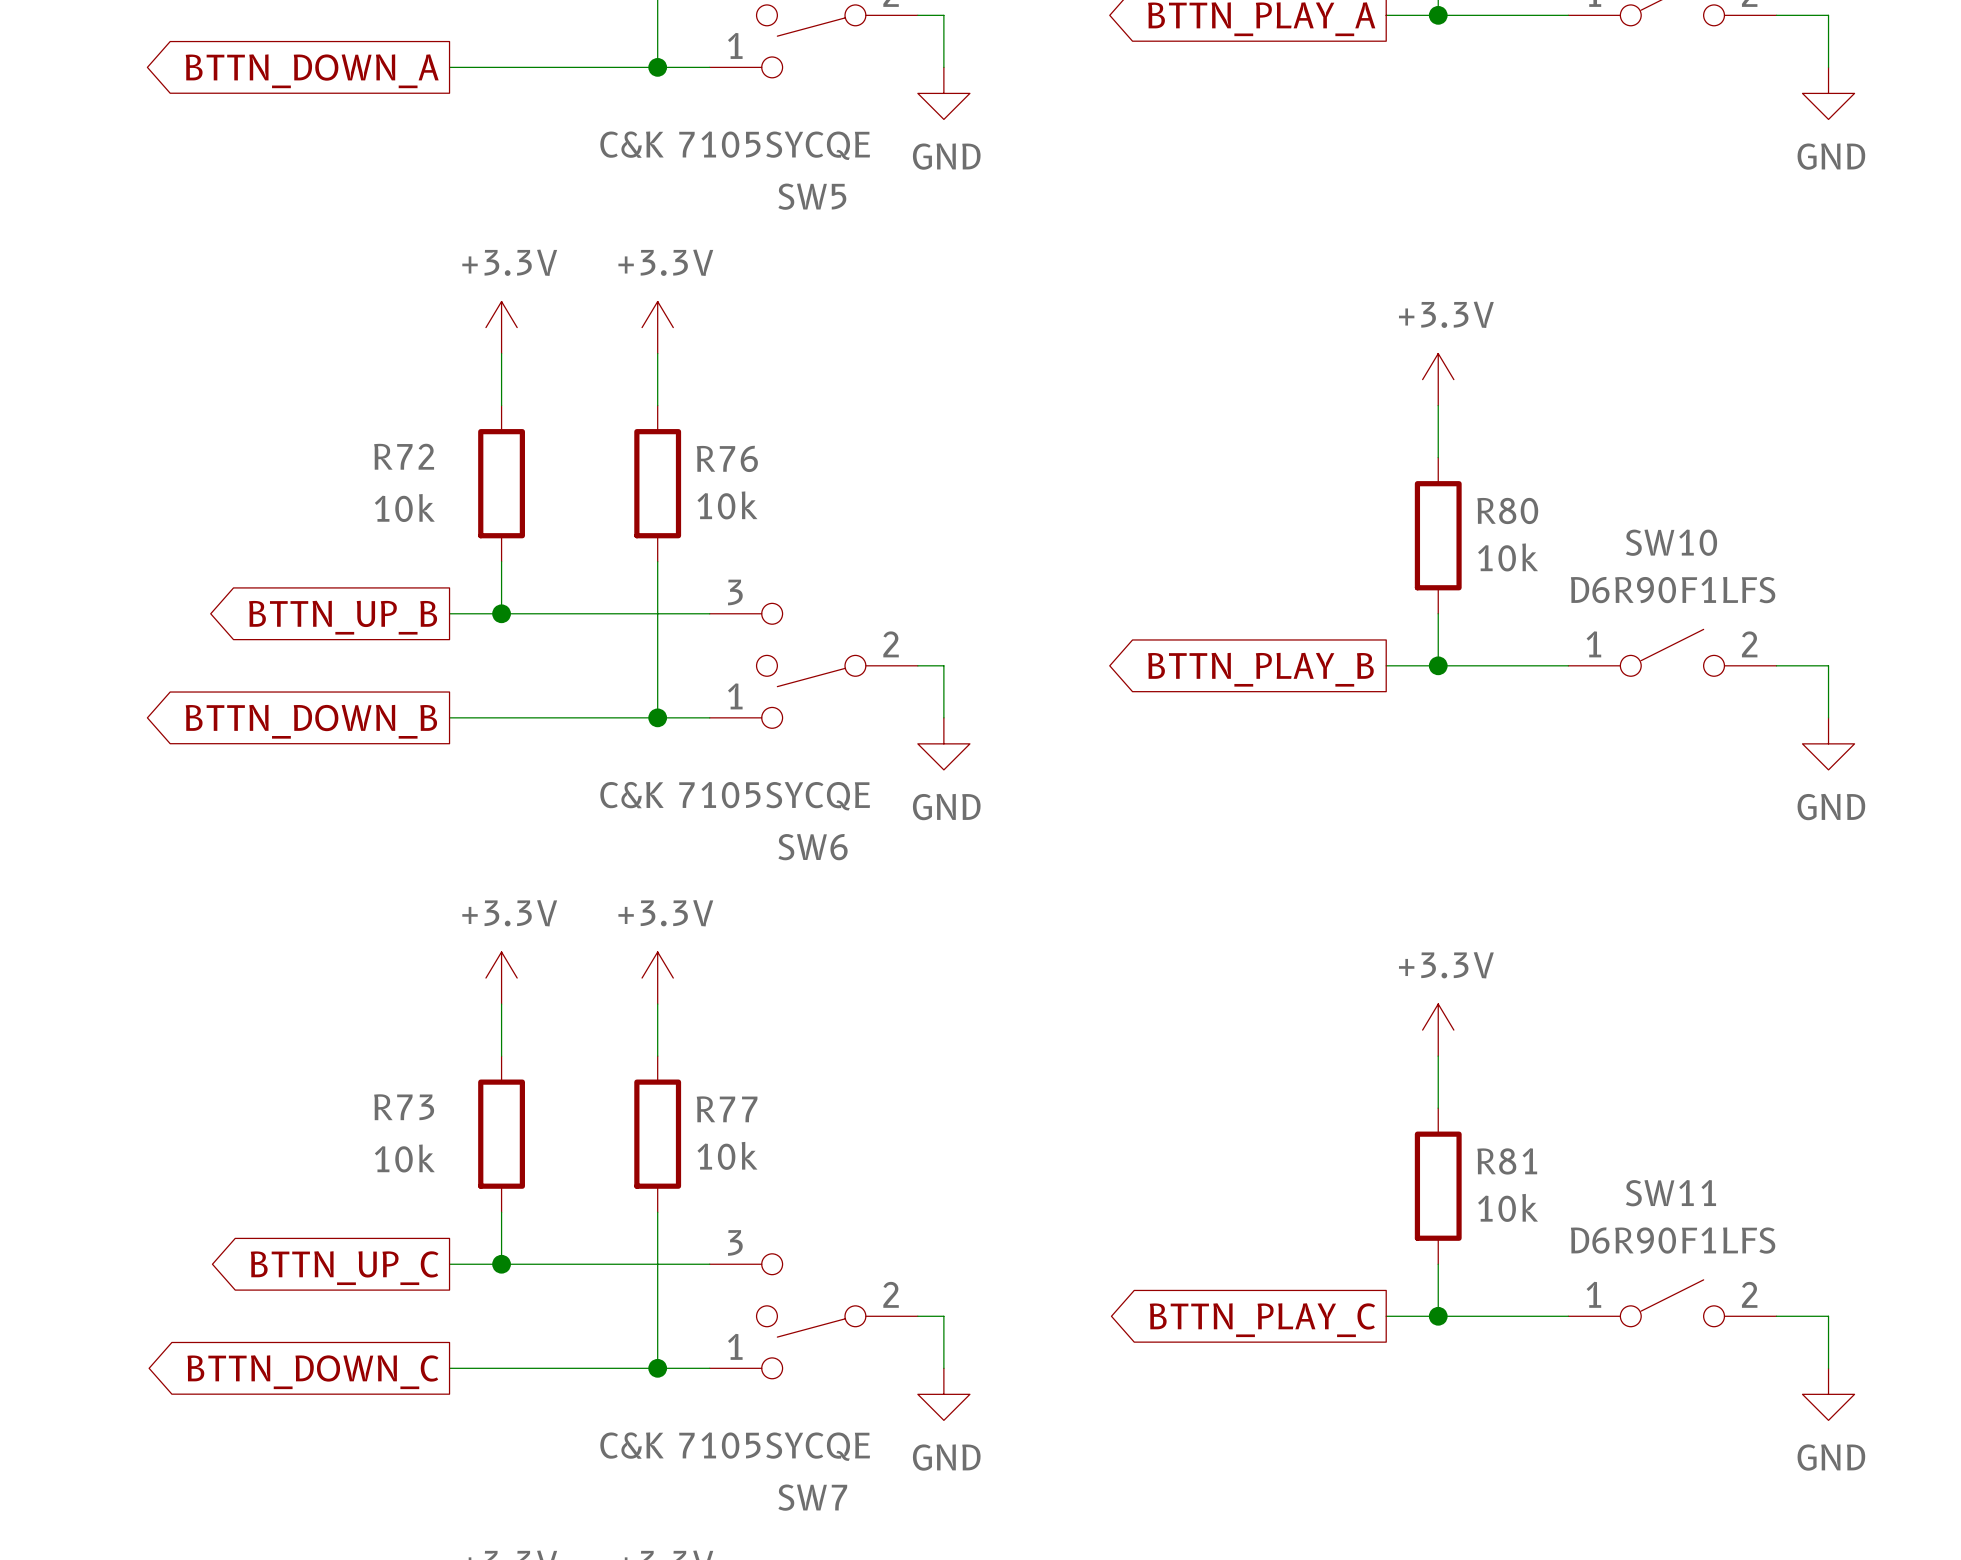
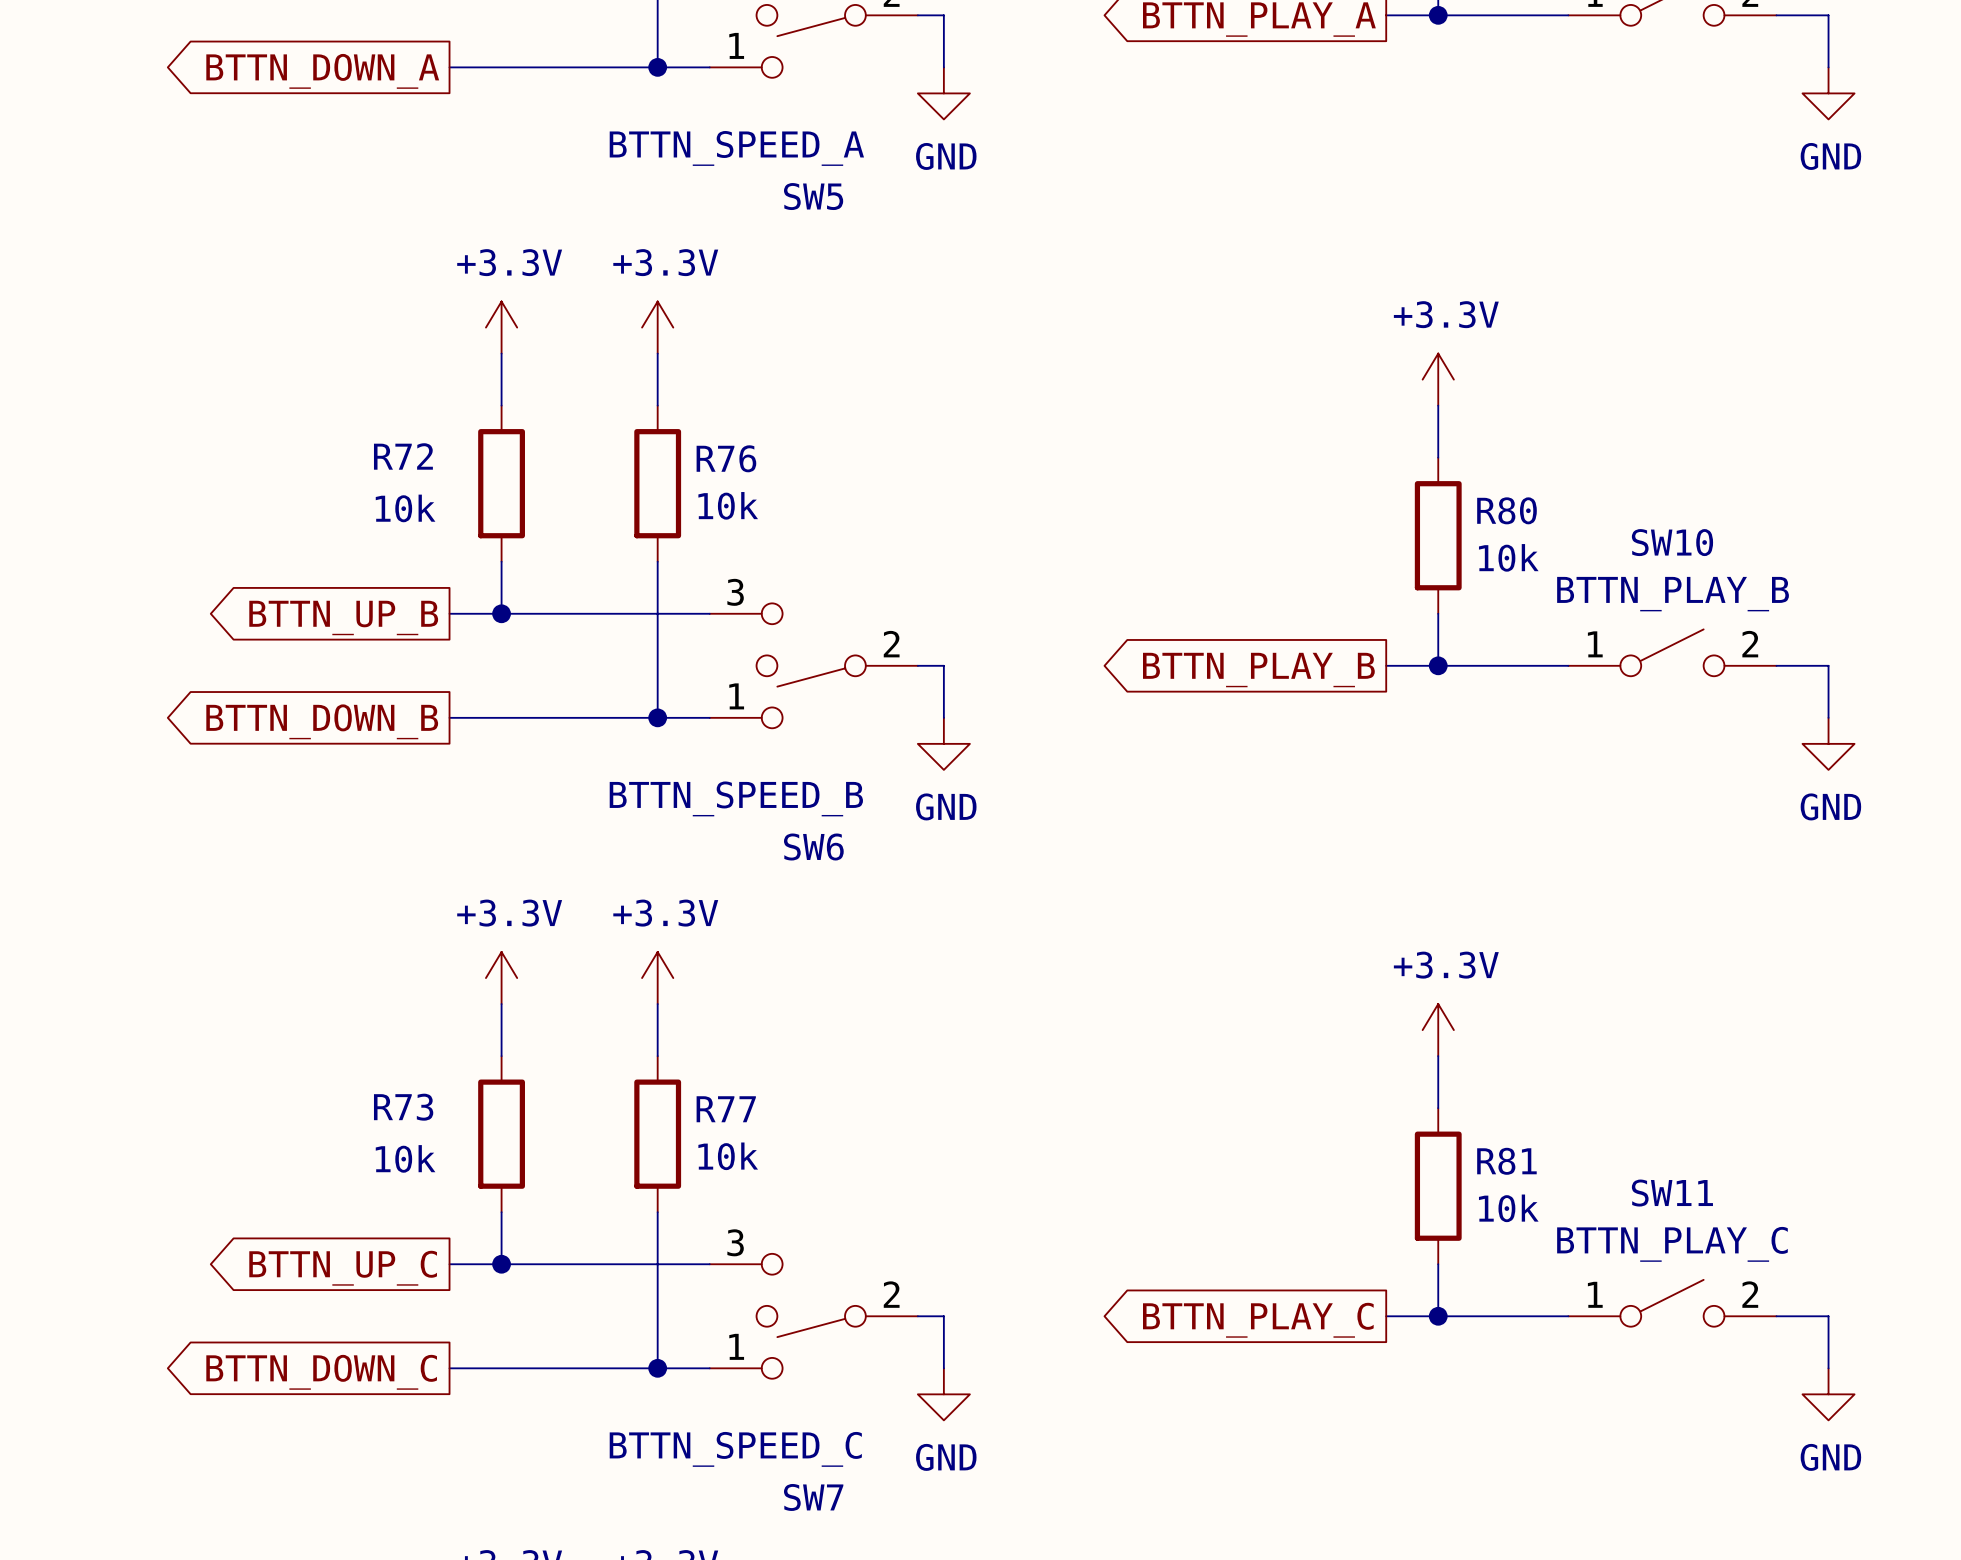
SW5 value: C&K 7105SYCQE (735, 145) -> BTTN_SPEED_A (736, 148)
SW10 value: D6R90F1LFS (1673, 590) -> BTTN_PLAY_B (1673, 594)
SW6 value: C&K 7105SYCQE (735, 796) -> BTTN_SPEED_B (736, 798)
SW11 value: D6R90F1LFS (1673, 1240) -> BTTN_PLAY_C (1672, 1244)
SW7 value: C&K 7105SYCQE (735, 1446) -> BTTN_SPEED_C (735, 1449)

